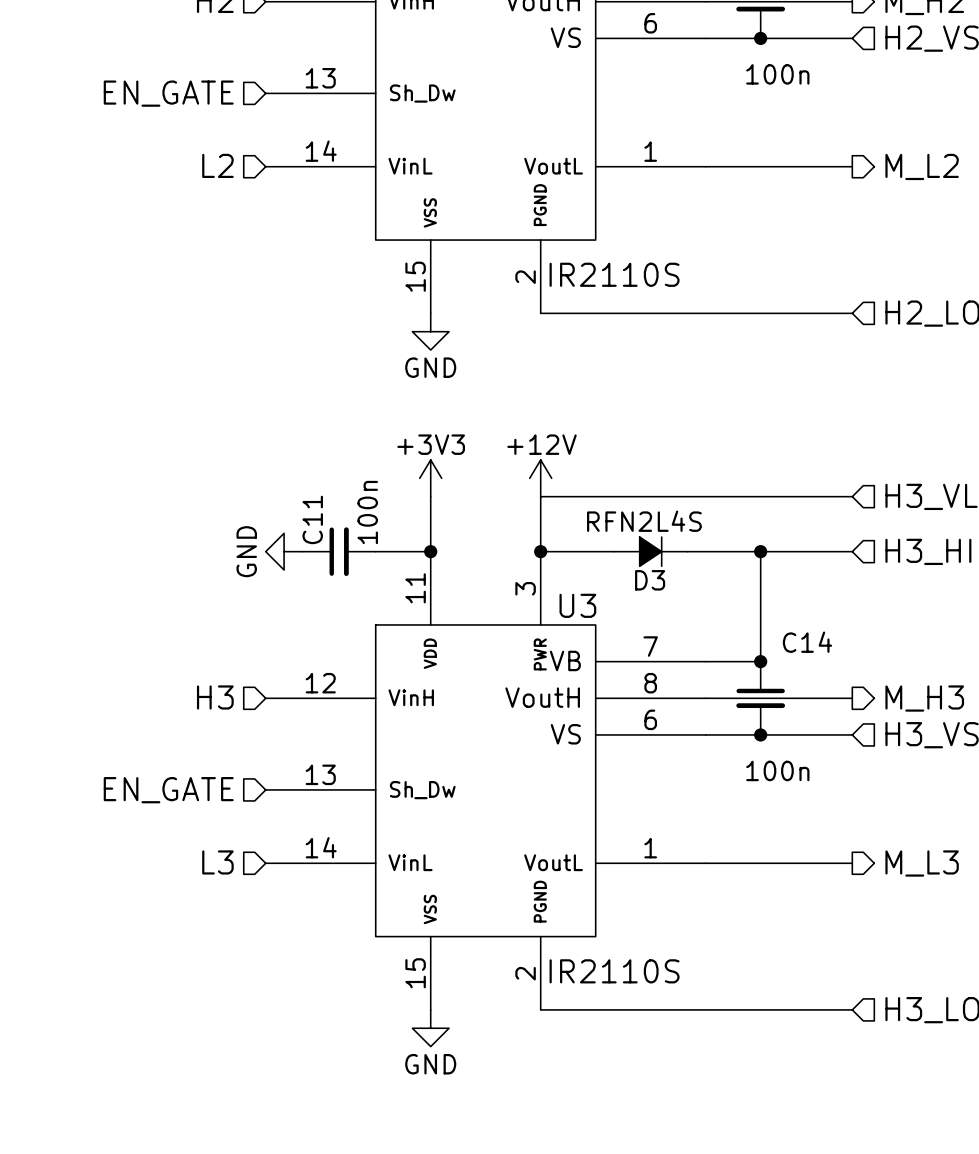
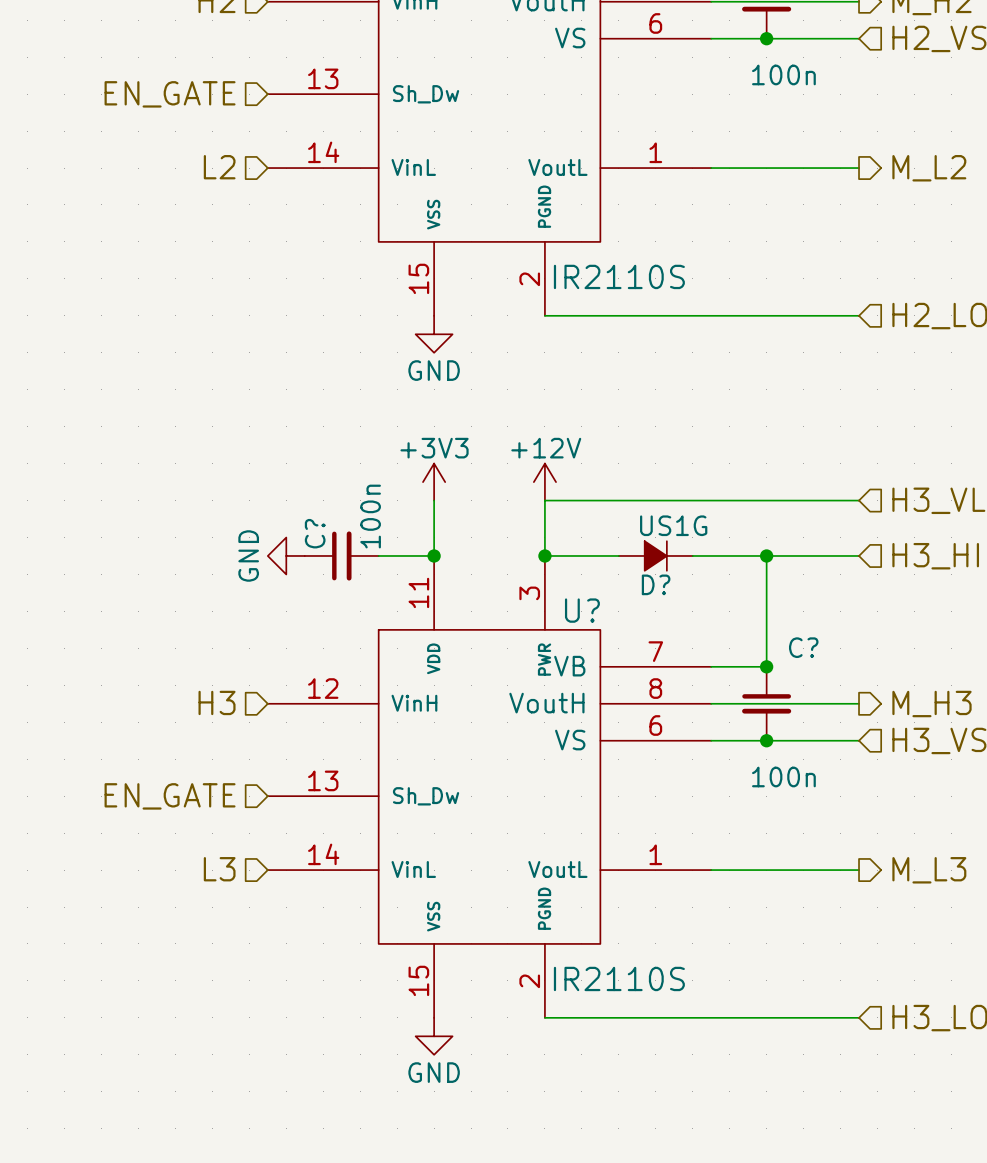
C11 name: C11 (312, 519) -> C? (315, 533)
D3 value: RFN2L4S (644, 521) -> US1G (673, 525)
D3 name: D3 (650, 580) -> D? (656, 584)
U3 name: U3 (577, 605) -> U? (582, 610)
C14 name: C14 (807, 642) -> C? (803, 647)

